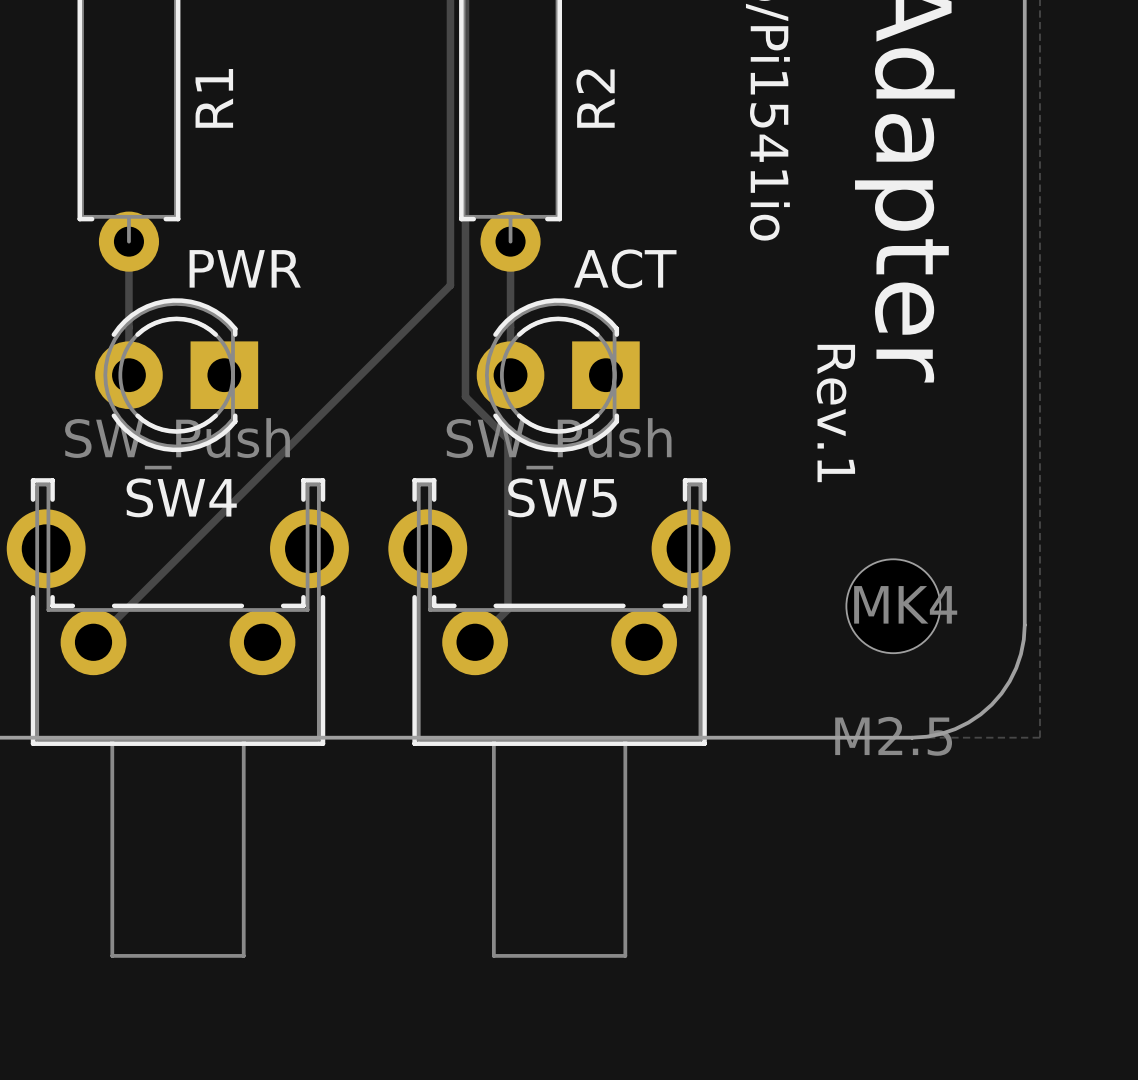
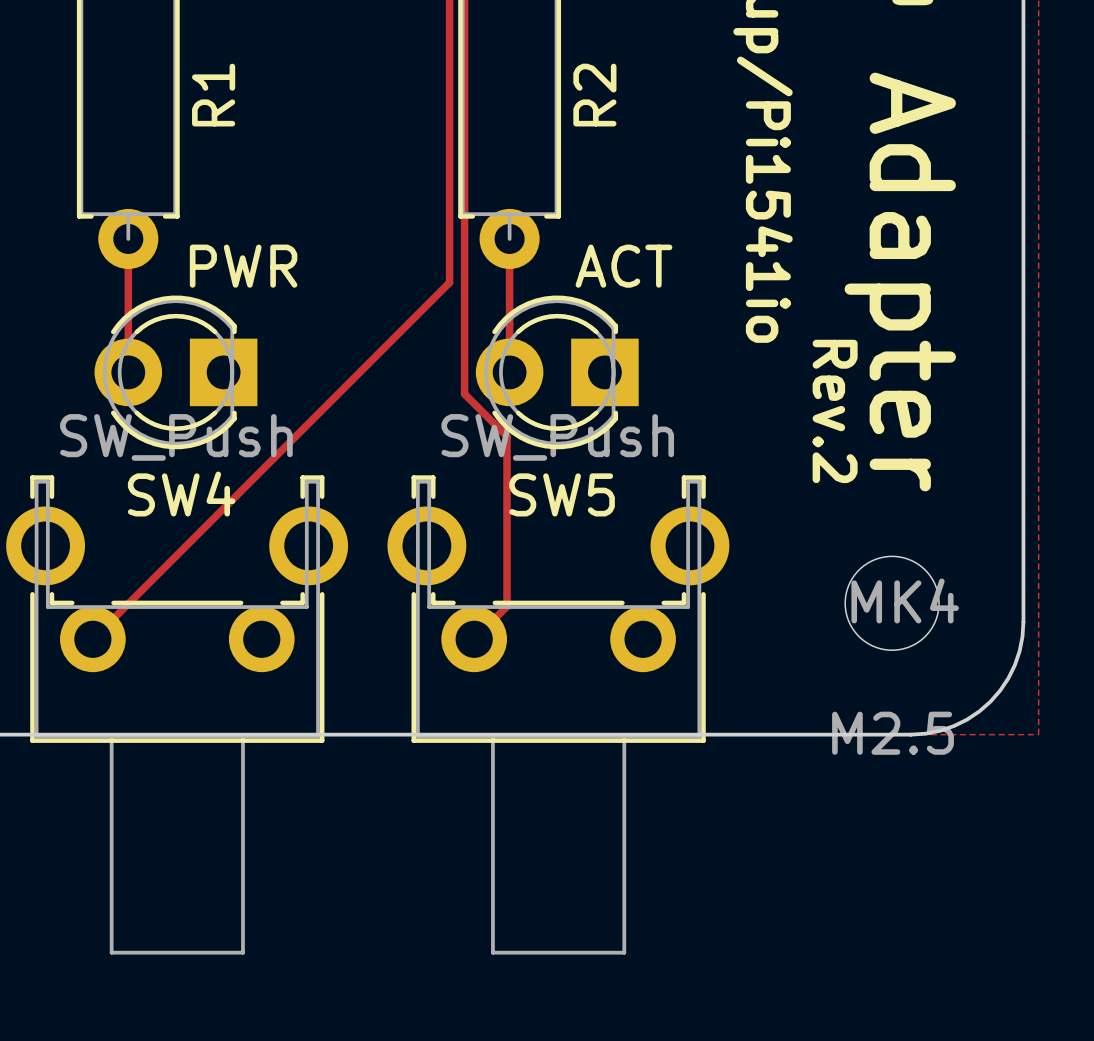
text: Rev.1 (835, 413) -> Rev.2 (835, 411)

